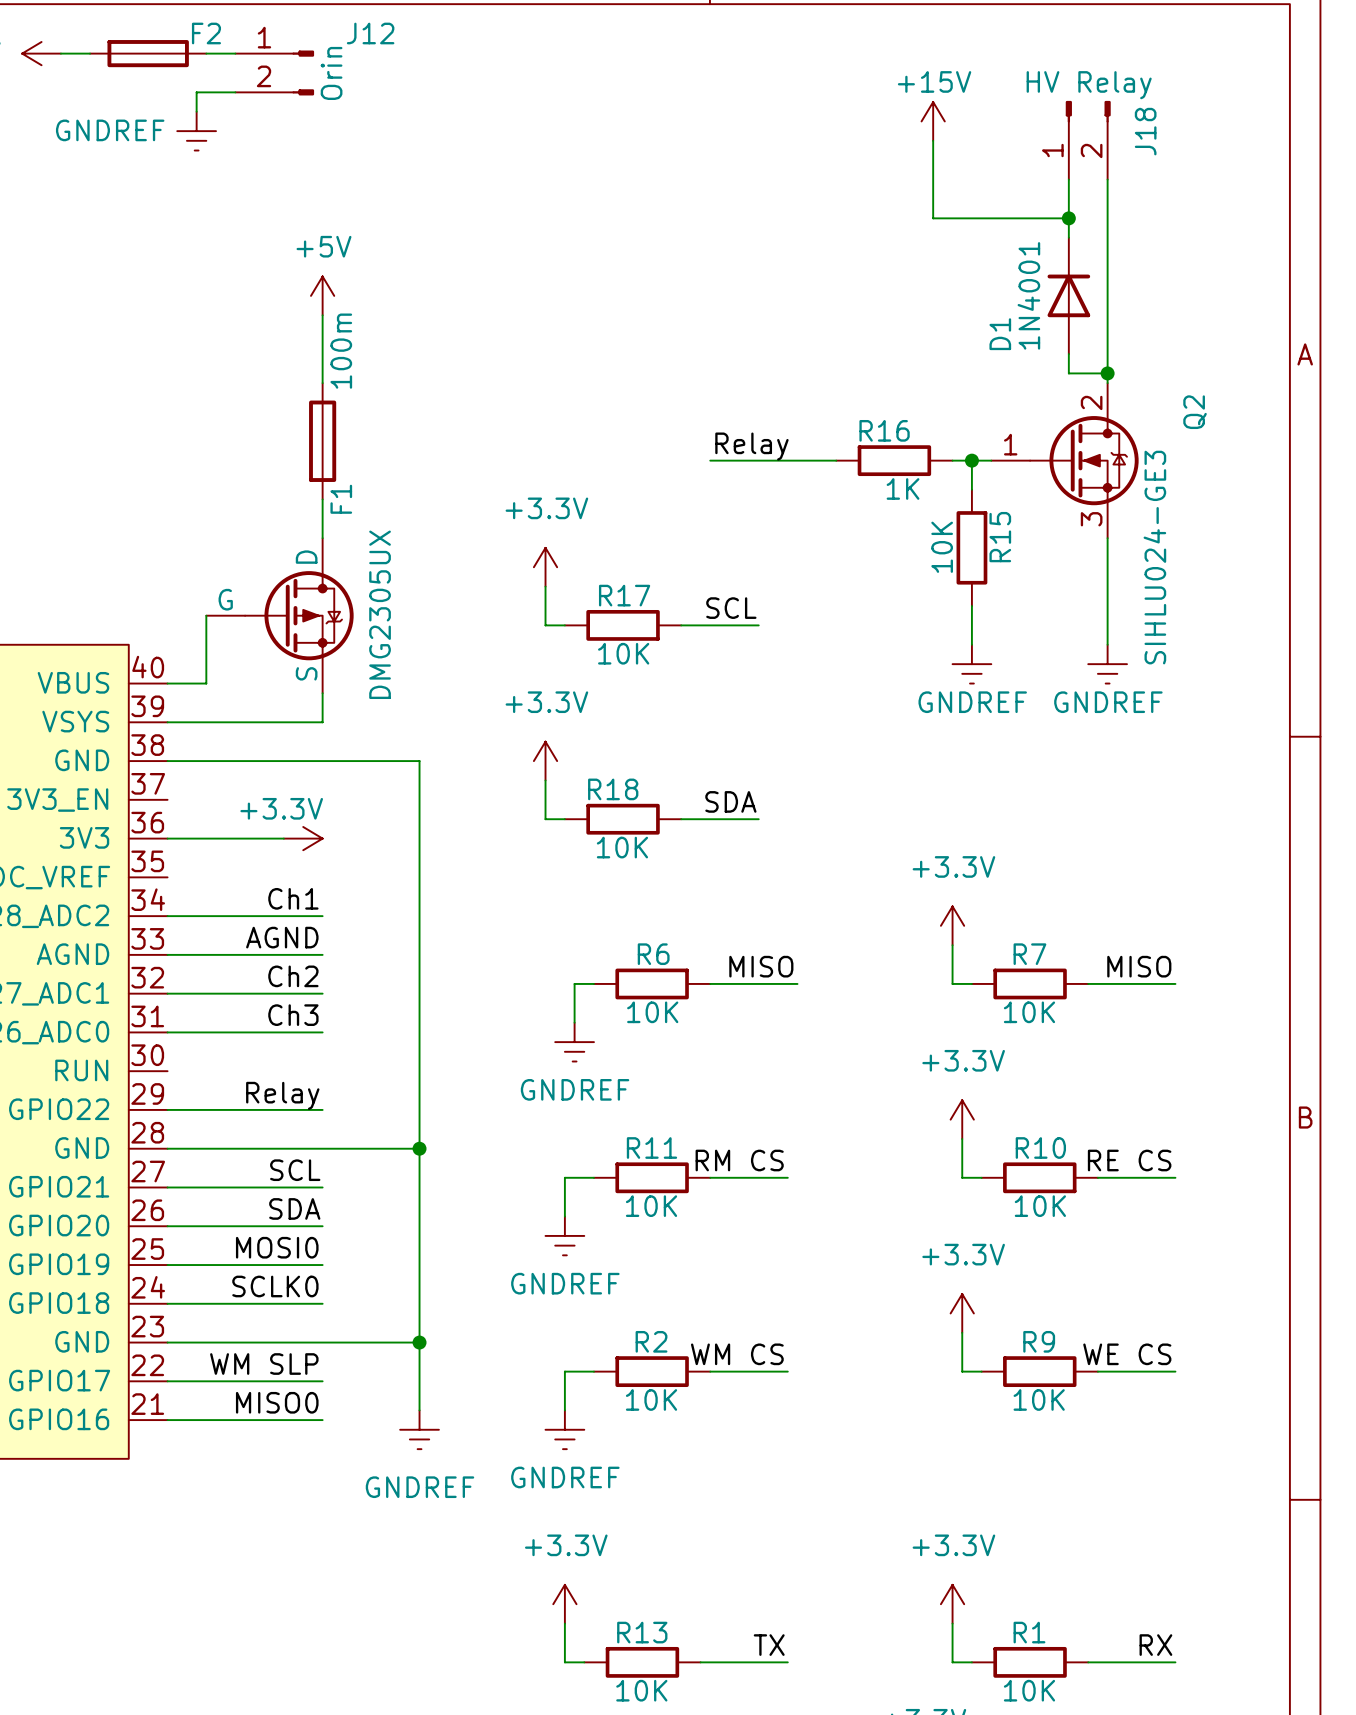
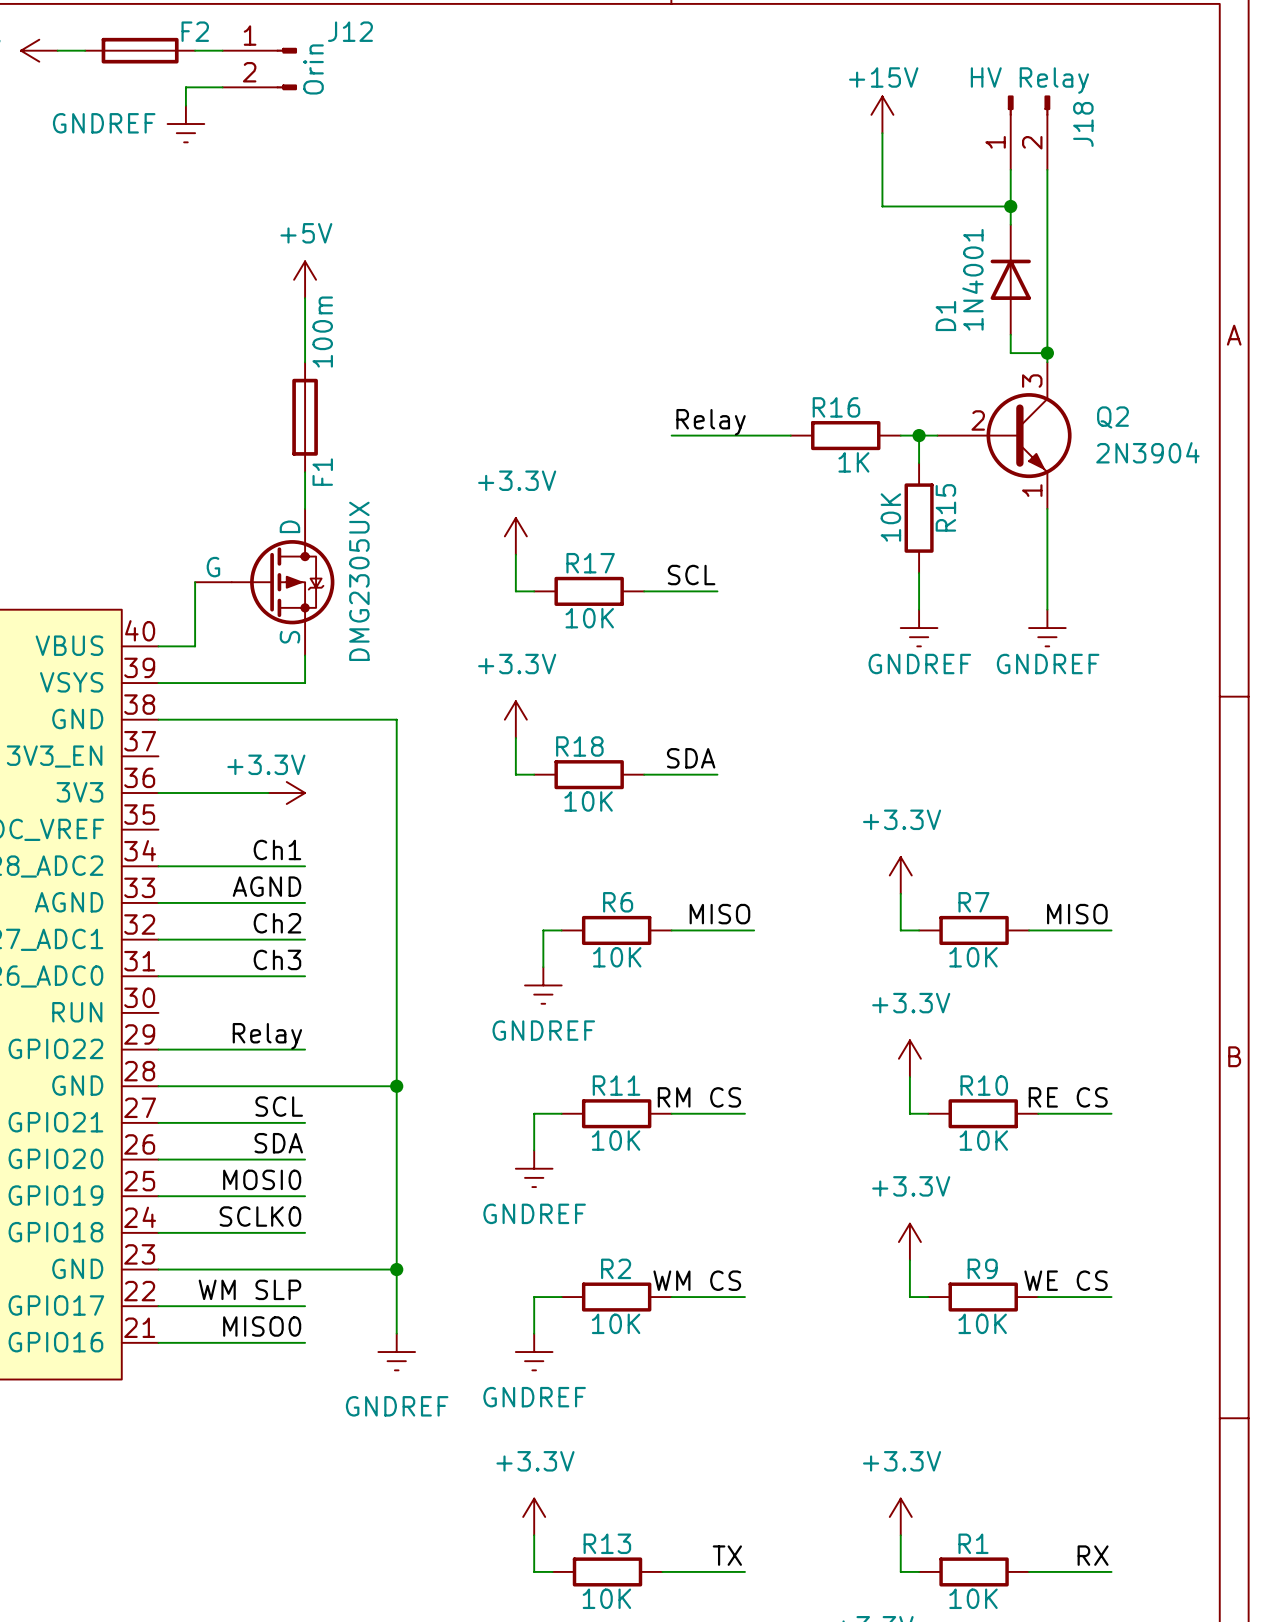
Q2 symbol: [991, 383, 1139, 539] -> [937, 362, 1072, 509]
Q2 name position: Q2 (1195, 412) -> Q2 (1112, 417)
Q2 value: SIHLU024-GE3 (1154, 557) -> 2N3904 (1147, 452)

